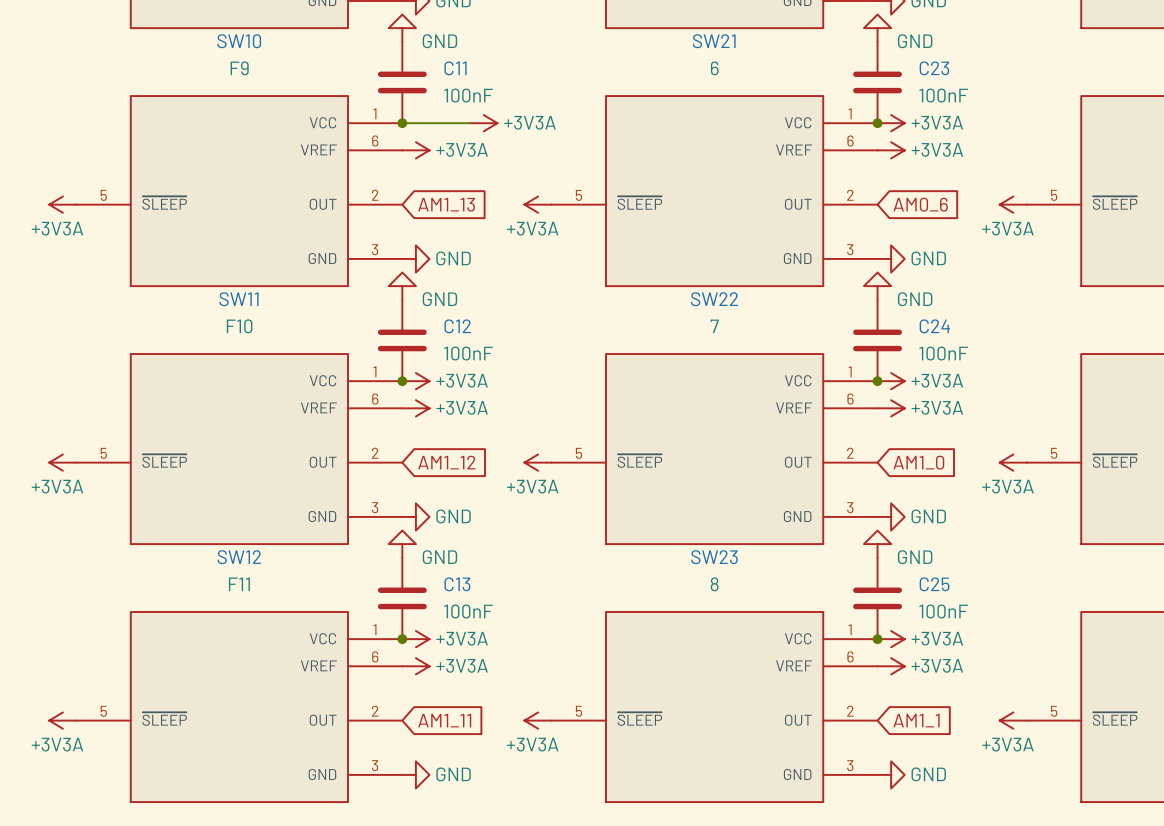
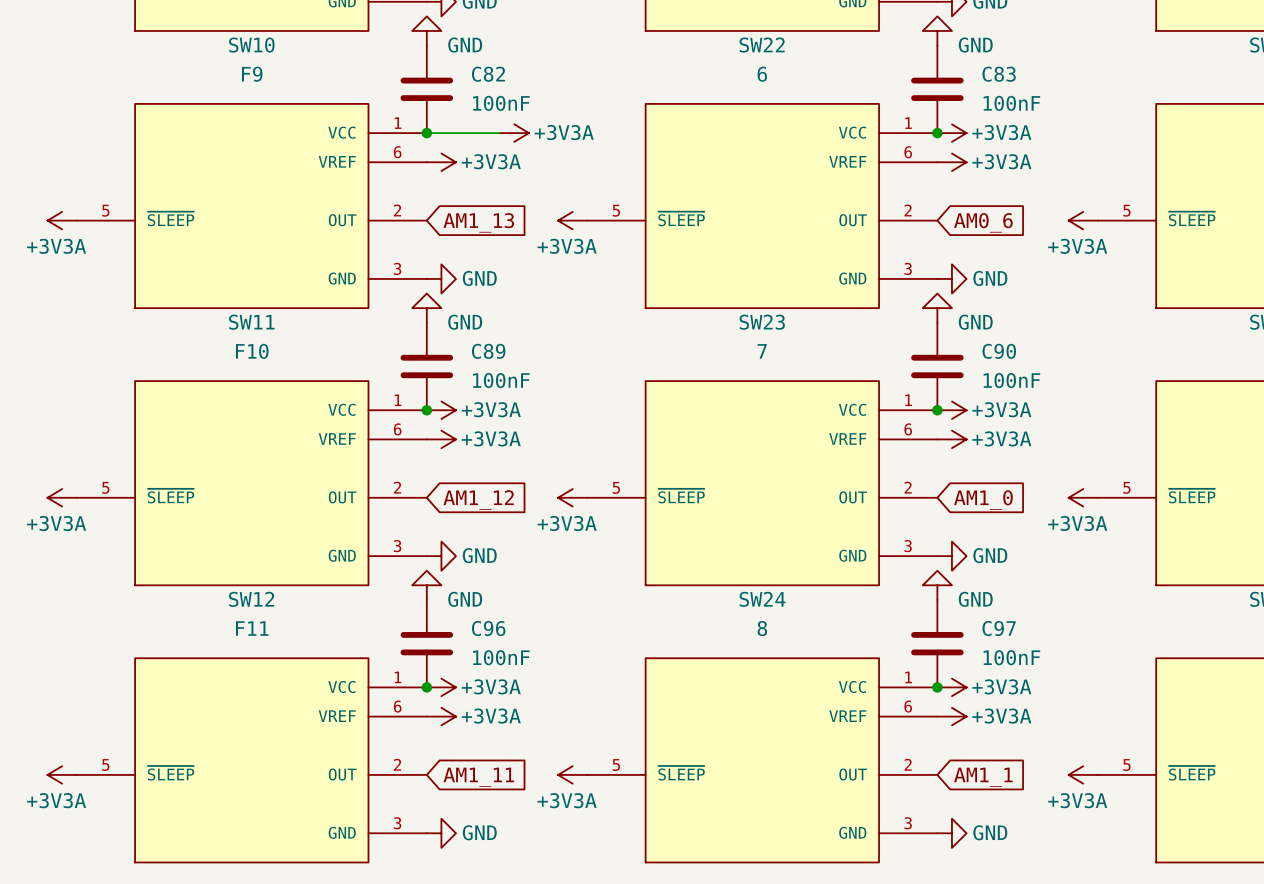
SW21 name: SW21 (714, 41) -> SW22 (762, 45)
C11 name: C11 (455, 68) -> C82 (488, 74)
C23 name: C23 (934, 68) -> C83 (999, 74)
SW22 name: SW22 (714, 299) -> SW23 (762, 322)
C12 name: C12 (457, 326) -> C89 (488, 351)
C24 name: C24 (934, 326) -> C90 (999, 351)
SW23 name: SW23 (714, 557) -> SW24 (762, 599)
C13 name: C13 (457, 584) -> C96 (488, 628)
C25 name: C25 (934, 584) -> C97 (999, 628)

